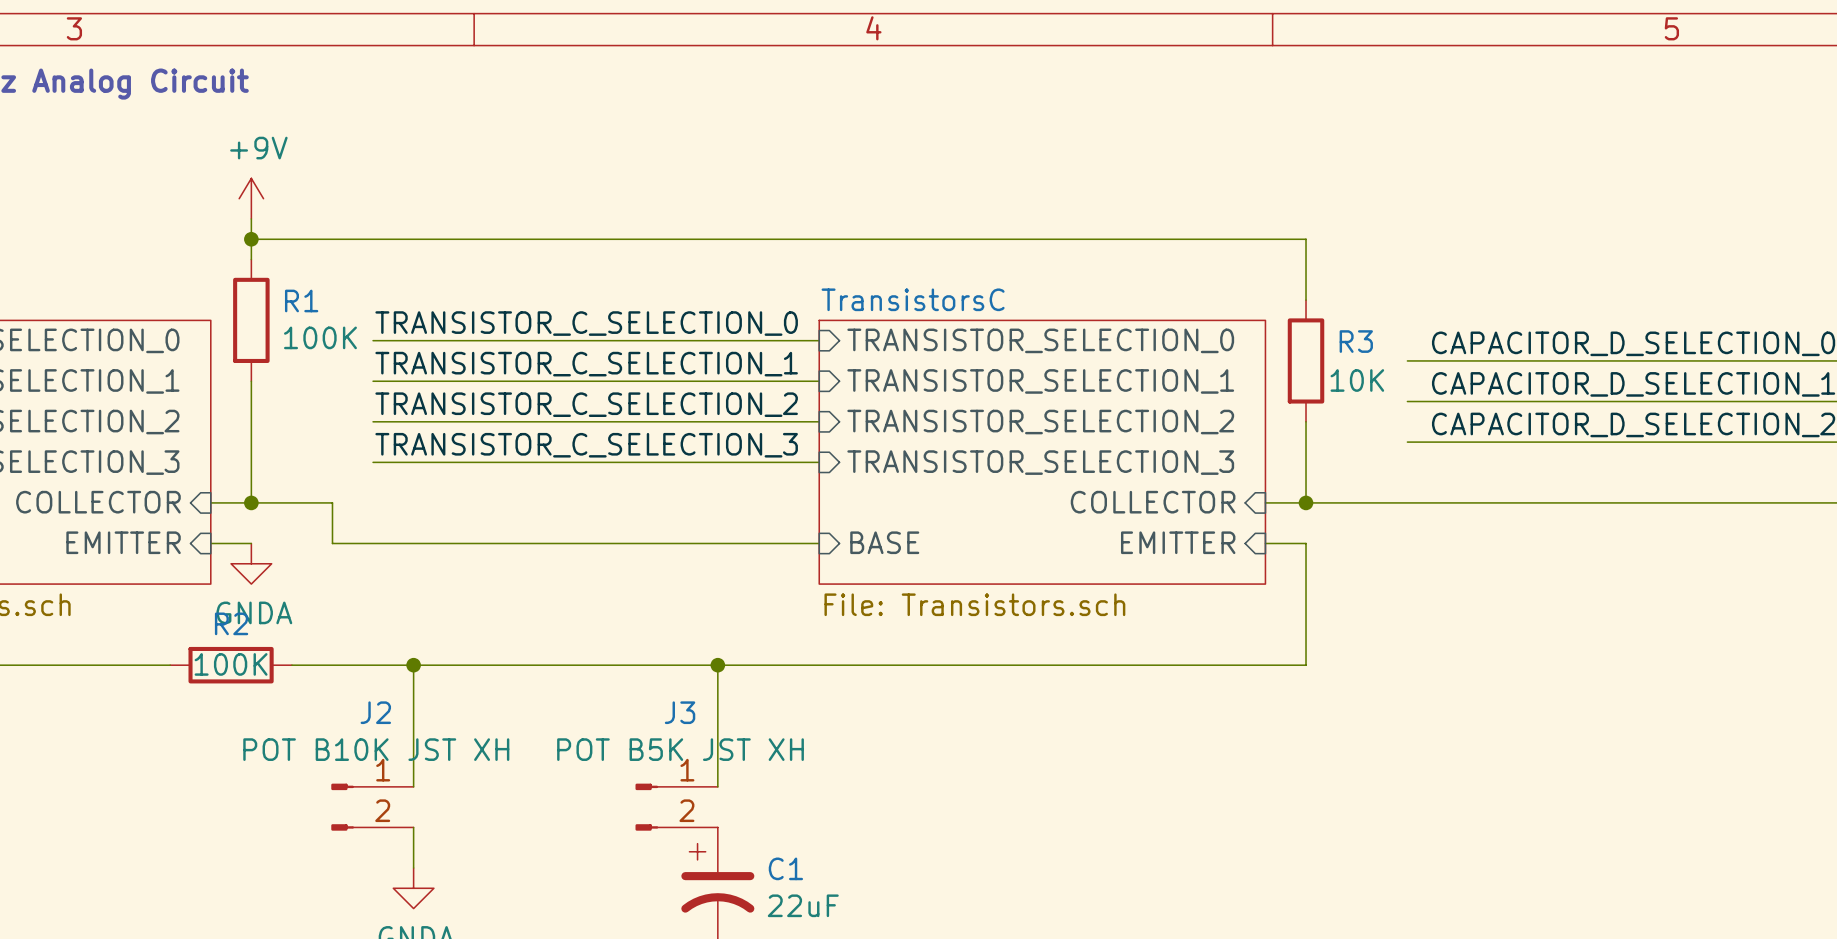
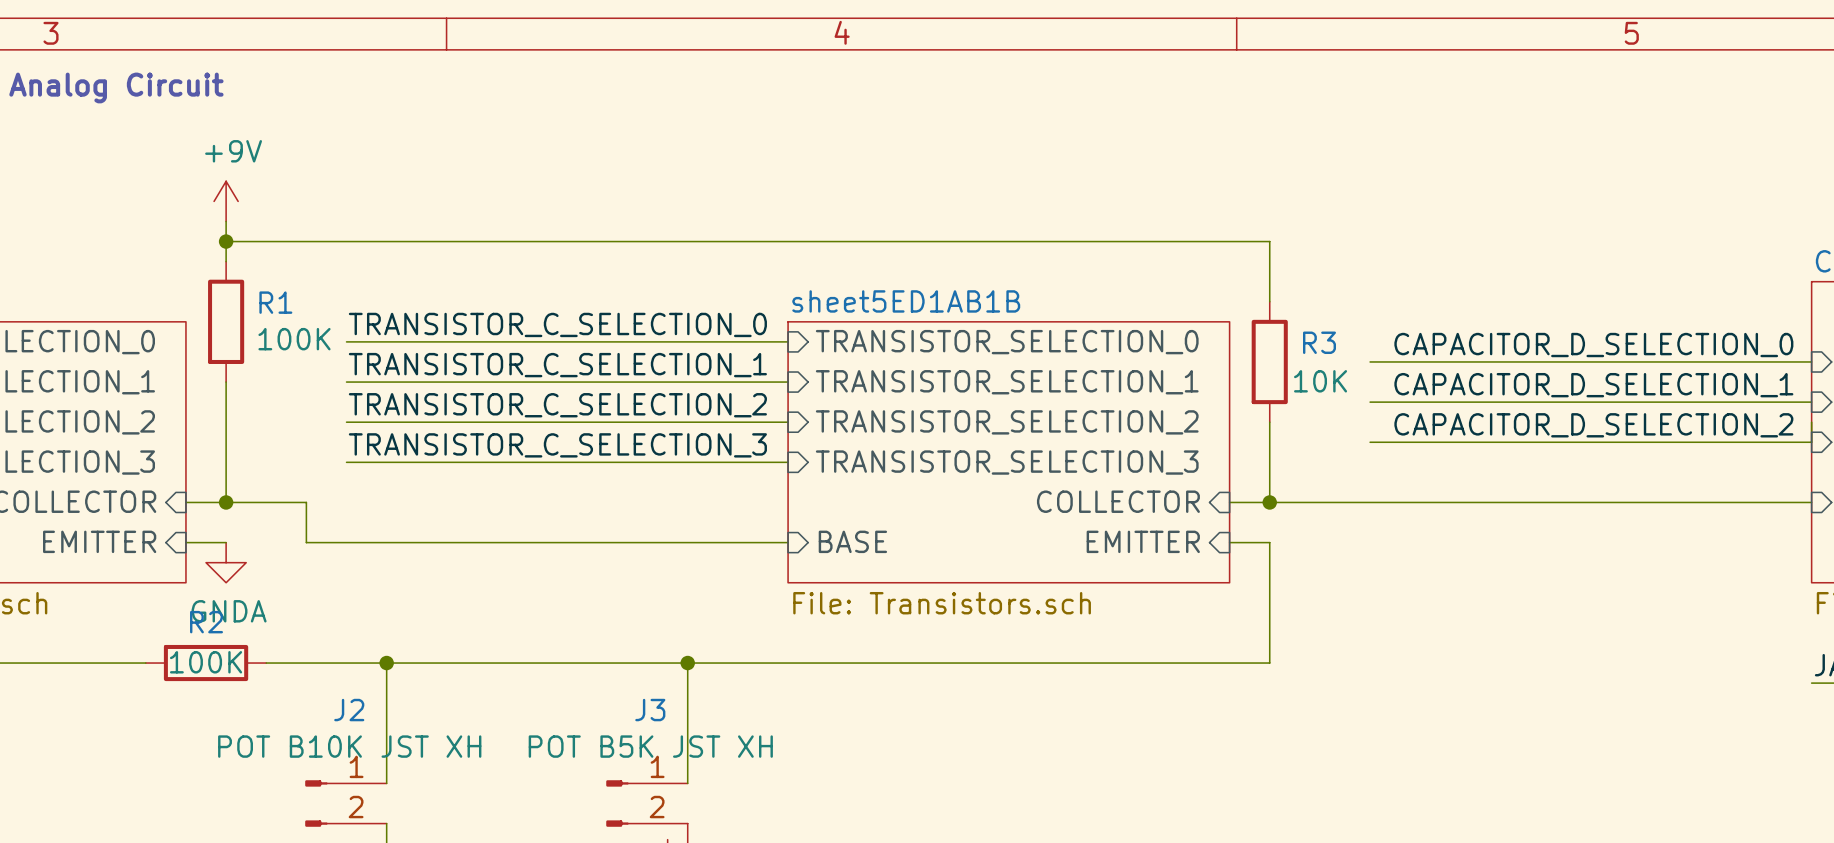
sheet TransistorsC name: TransistorsC (913, 299) -> sheet5ED1AB1B (906, 301)

